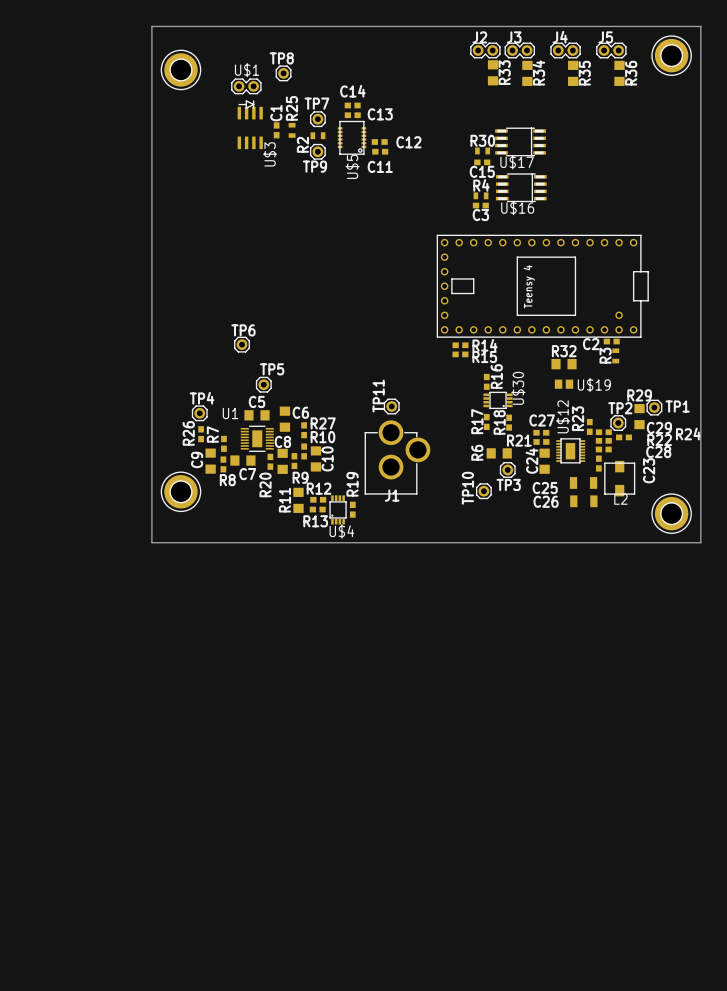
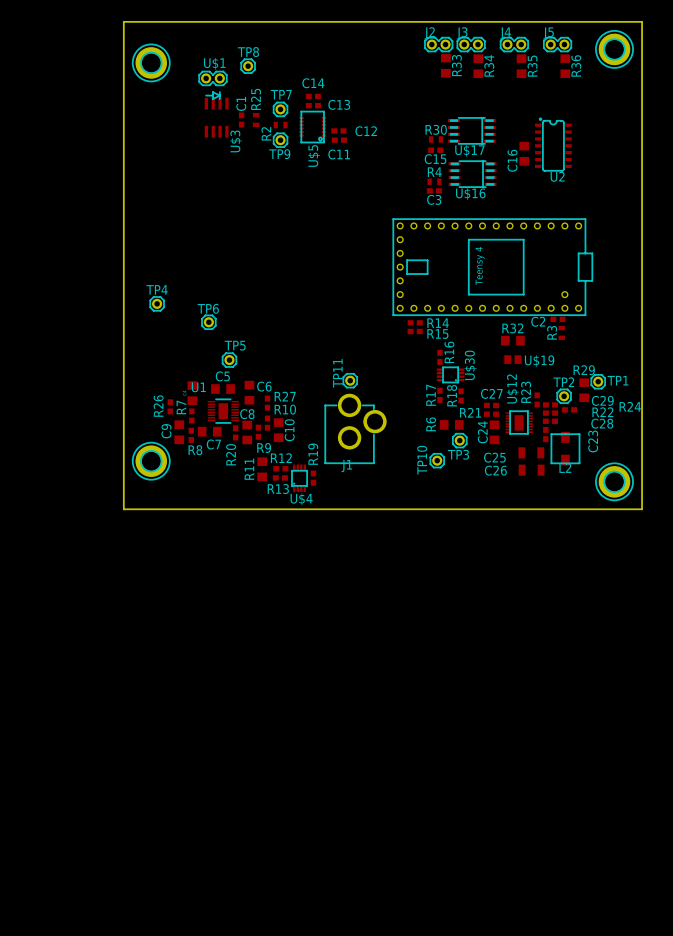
U2: none -> (553, 144)
C16: none -> (524, 153)
TP4 position: (199, 413) -> (157, 303)
part: none -> (192, 393)

